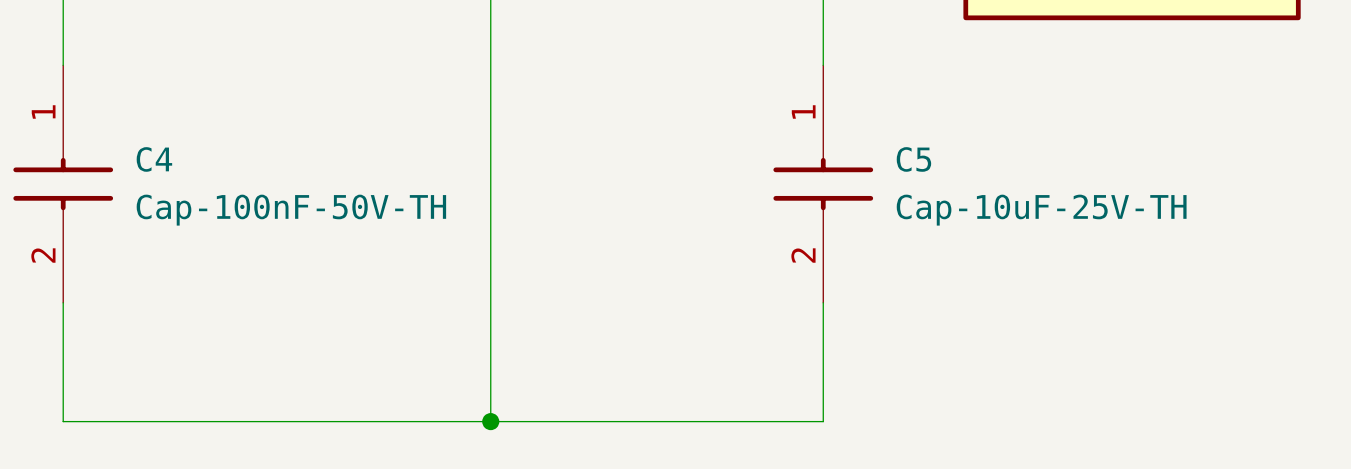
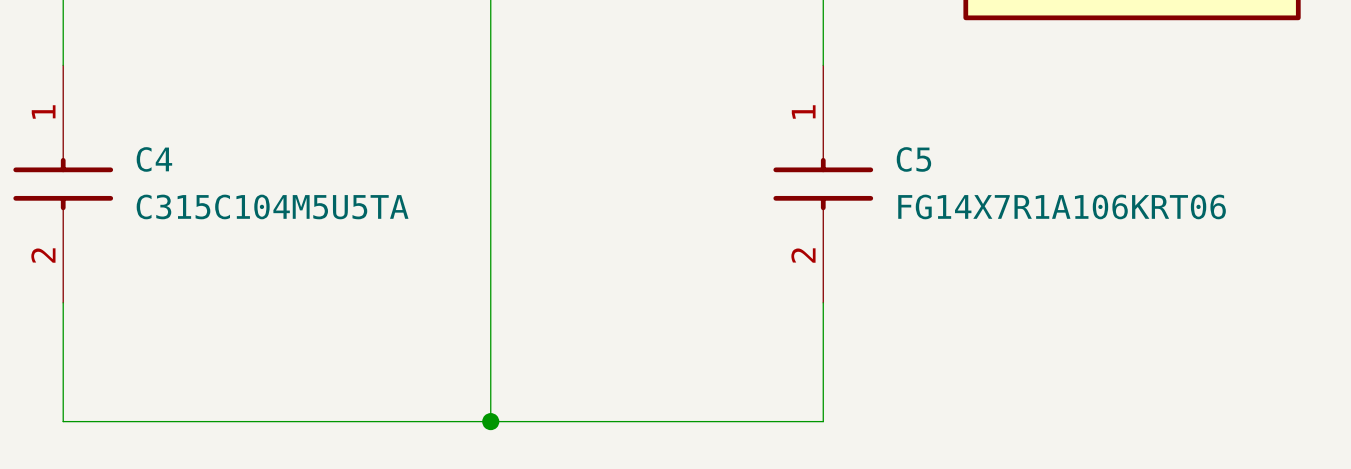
C4 value: Cap-100nF-50V-TH (291, 210) -> C315C104M5U5TA (272, 206)
C5 value: Cap-10uF-25V-TH (1041, 210) -> FG14X7R1A106KRT06 (1062, 206)

